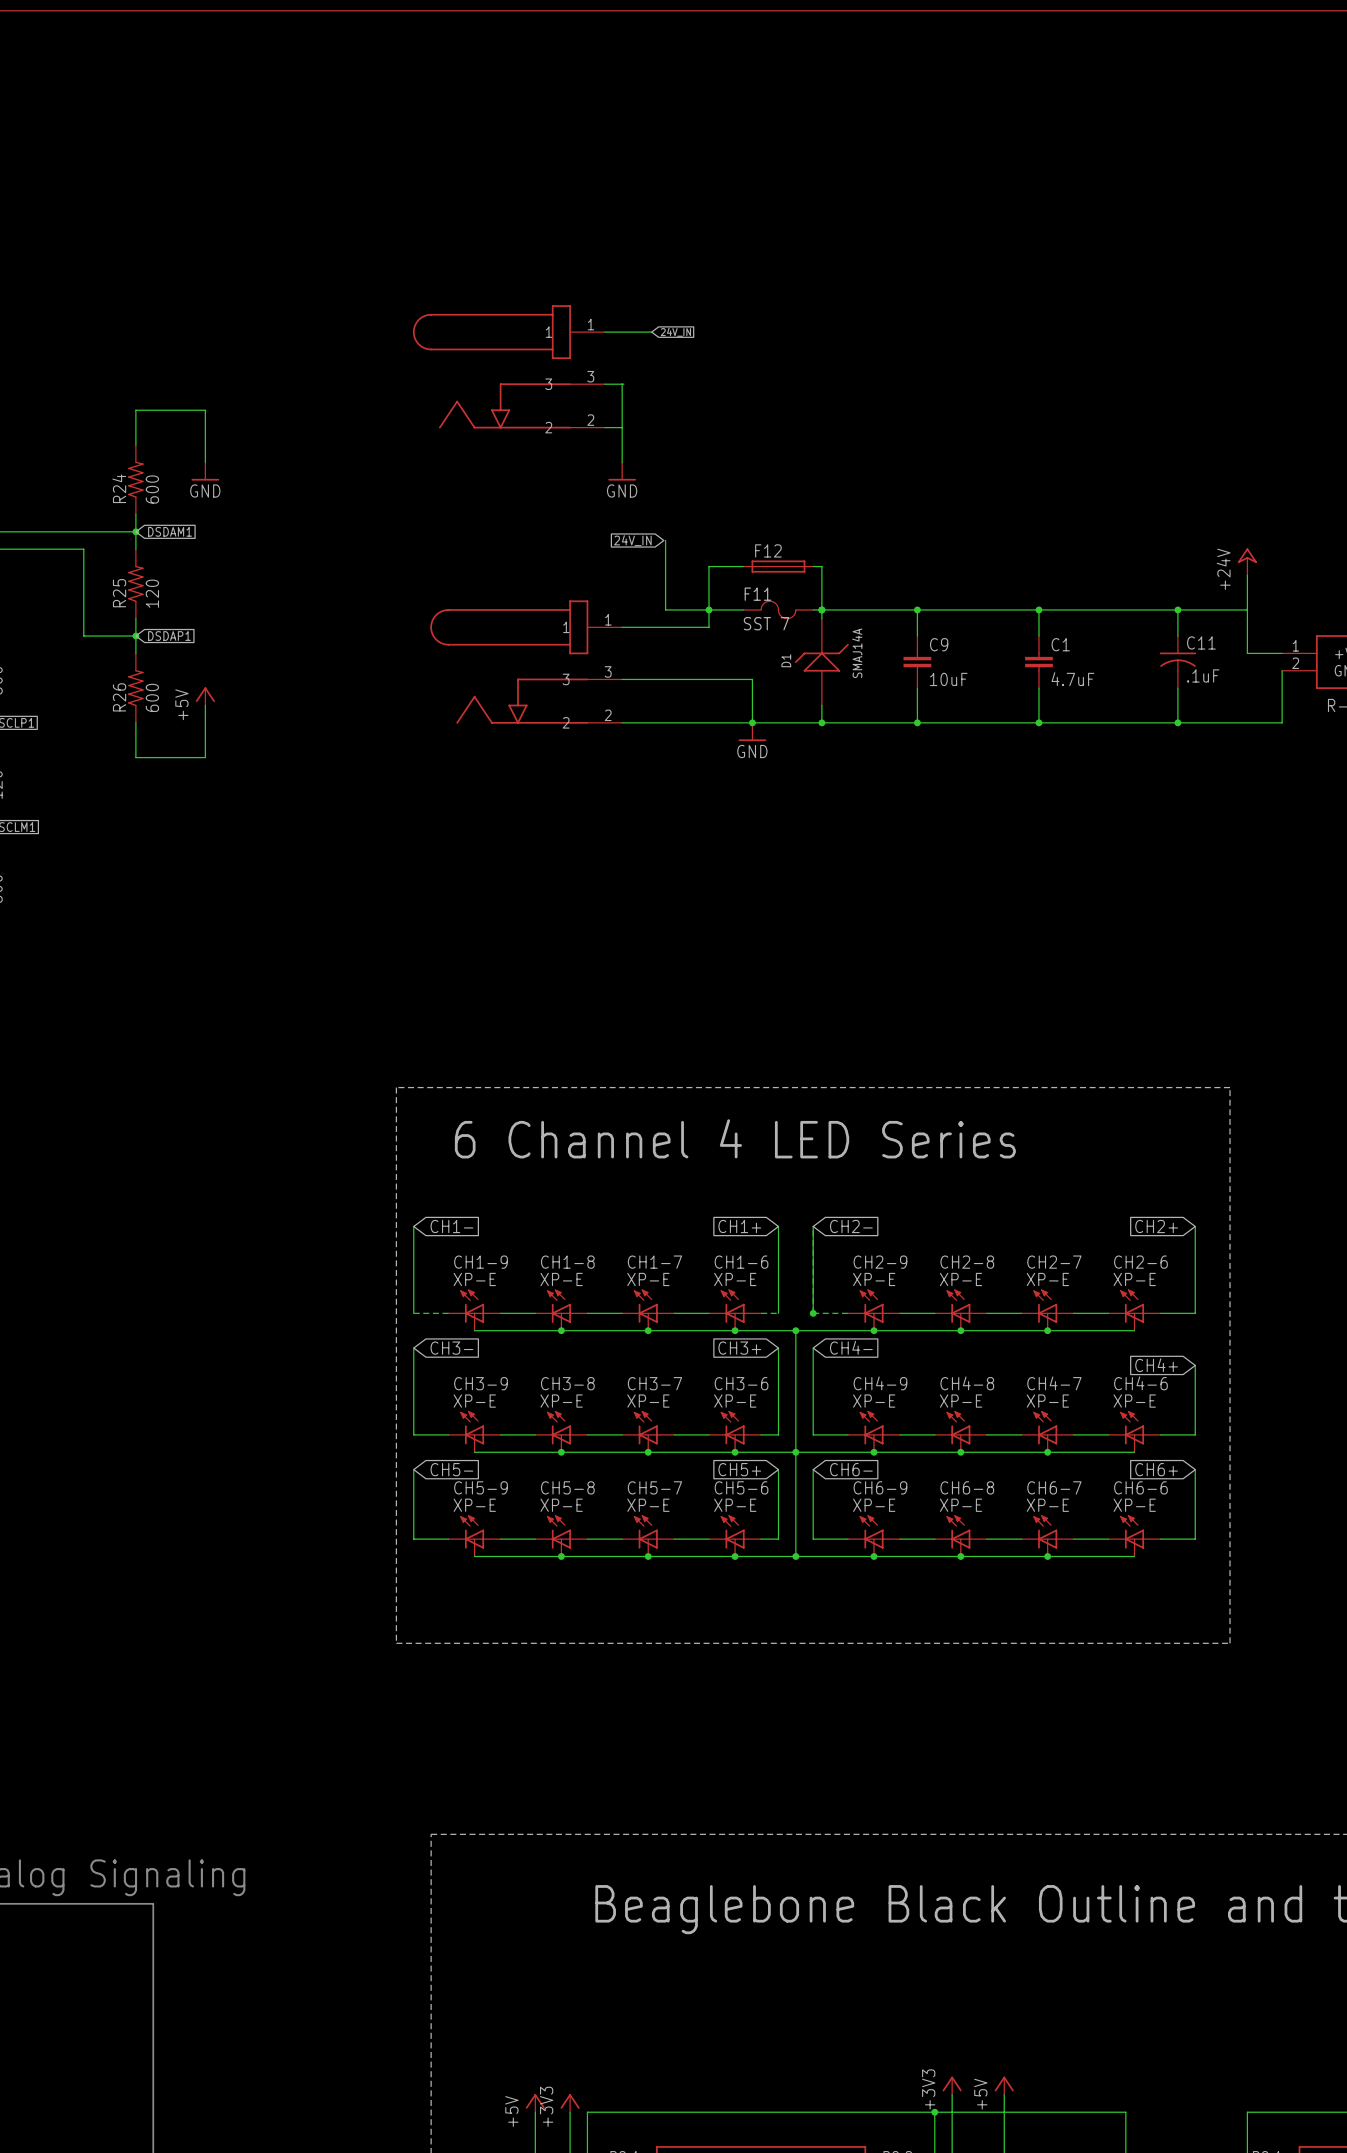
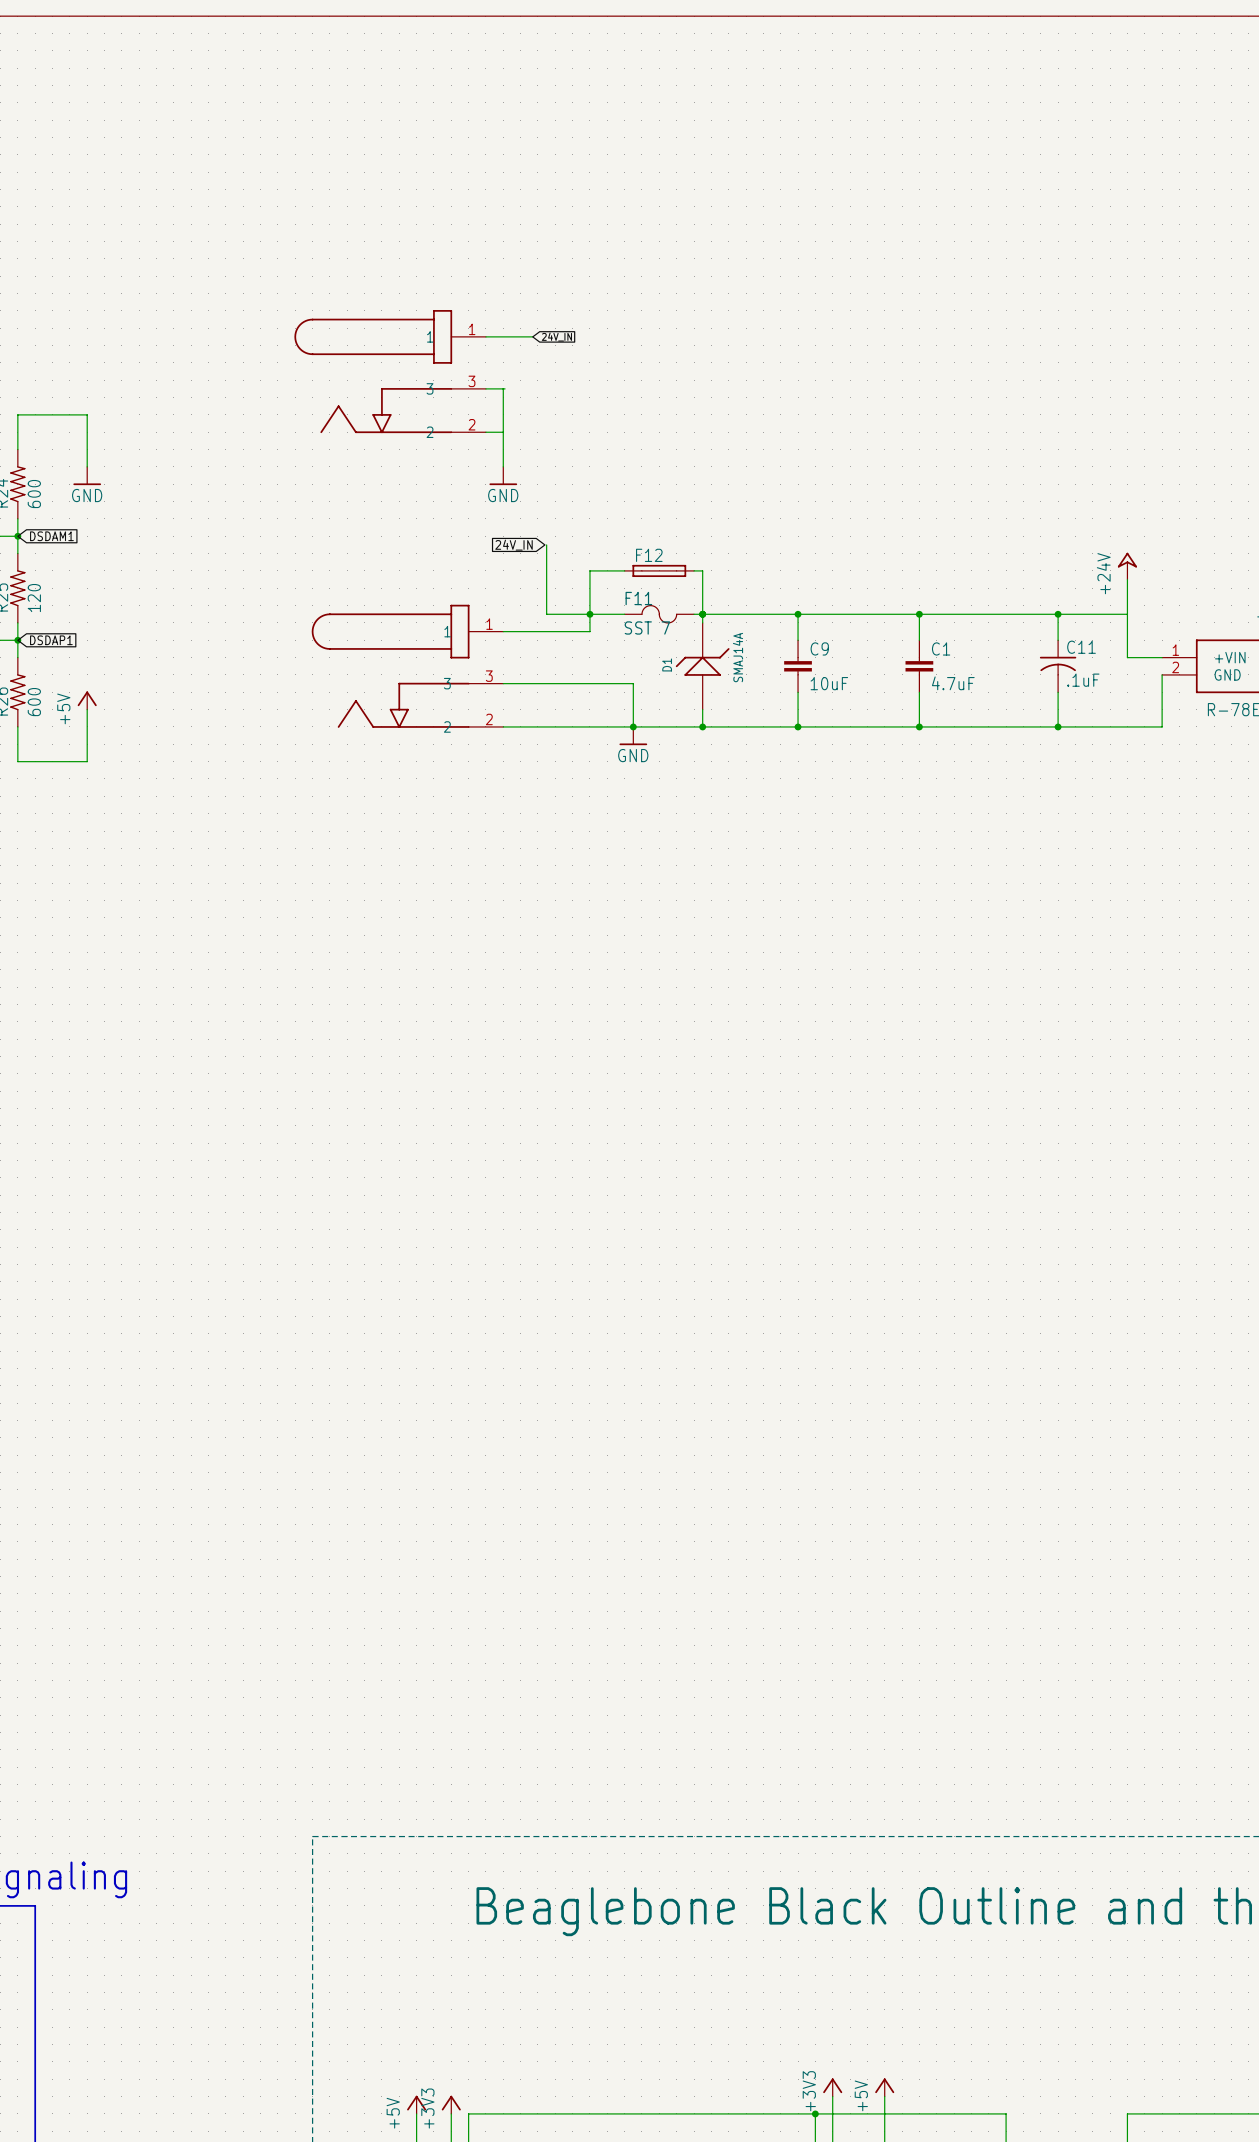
line: (396, 1087) (1230, 1087) (1230, 1643) (396, 1643) (396, 1087) -> none
text: 6 Channel 4 LED Series (735, 1138) -> none
wire: (413, 1226) (413, 1313) (448, 1313) -> none
global label: CH1- (451, 1226) -> none
global label: CH1+ (739, 1226) -> none
wire: (778, 1226) (778, 1313) (761, 1313) -> none
global label: CH2- (851, 1226) -> none
global label: CH2+ (1156, 1226) -> none
wire: (1195, 1226) (1195, 1313) (1160, 1313) -> none
CH1-9: XP-E (474, 1310) -> none
CH1-8: XP-E (561, 1310) -> none
CH1-7: XP-E (648, 1310) -> none
CH1-6: XP-E (735, 1310) -> none
CH2-9: XP-E (873, 1310) -> none
CH2-8: XP-E (960, 1310) -> none
CH2-7: XP-E (1047, 1310) -> none
CH2-6: XP-E (1134, 1310) -> none
wire: (500, 1313) (535, 1313) -> none
wire: (587, 1313) (622, 1313) -> none
wire: (674, 1313) (709, 1313) -> none
wire: (813, 1313) (847, 1313) -> none
wire: (813, 1313) (813, 1226) (813, 1313) -> none
junction: (813, 1313) -> none
wire: (900, 1313) (934, 1313) -> none
wire: (986, 1313) (1021, 1313) -> none
wire: (1073, 1313) (1108, 1313) -> none
wire: (474, 1330) (1134, 1330) -> none
junction: (561, 1330) -> none
junction: (648, 1330) -> none
junction: (735, 1330) -> none
wire: (795, 1330) (795, 1556) -> none
junction: (795, 1330) -> none
junction: (873, 1330) -> none
junction: (960, 1330) -> none
junction: (1047, 1330) -> none
global label: CH4- (851, 1347) -> none
wire: (413, 1348) (413, 1434) (448, 1434) -> none
global label: CH3- (451, 1348) -> none
global label: CH3+ (739, 1348) -> none
wire: (778, 1348) (778, 1434) (761, 1434) -> none
wire: (813, 1348) (813, 1434) (847, 1434) -> none
global label: CH4+ (1156, 1365) -> none
wire: (1195, 1365) (1195, 1434) (1160, 1434) -> none
CH3-9: XP-E (474, 1431) -> none
CH3-8: XP-E (561, 1431) -> none
CH3-7: XP-E (648, 1431) -> none
CH3-6: XP-E (735, 1431) -> none
CH4-9: XP-E (873, 1431) -> none
CH4-8: XP-E (960, 1431) -> none
CH4-7: XP-E (1047, 1431) -> none
CH4-6: XP-E (1134, 1431) -> none
wire: (500, 1434) (535, 1434) -> none
wire: (587, 1434) (622, 1434) -> none
wire: (674, 1434) (709, 1434) -> none
wire: (900, 1434) (934, 1434) -> none
wire: (986, 1434) (1021, 1434) -> none
wire: (1073, 1434) (1108, 1434) -> none
wire: (474, 1452) (1134, 1452) -> none
junction: (561, 1452) -> none
junction: (648, 1452) -> none
junction: (735, 1452) -> none
junction: (795, 1452) -> none
junction: (873, 1452) -> none
junction: (960, 1452) -> none
junction: (1047, 1452) -> none
wire: (413, 1469) (413, 1539) (448, 1539) -> none
global label: CH5- (451, 1469) -> none
global label: CH5+ (739, 1469) -> none
wire: (778, 1469) (778, 1539) (761, 1539) -> none
wire: (813, 1469) (813, 1539) (847, 1539) -> none
global label: CH6- (851, 1469) -> none
global label: CH6+ (1156, 1469) -> none
wire: (1195, 1469) (1195, 1539) (1160, 1539) -> none
CH5-9: XP-E (474, 1535) -> none
CH5-8: XP-E (561, 1535) -> none
CH5-7: XP-E (648, 1535) -> none
CH5-6: XP-E (735, 1535) -> none
CH6-9: XP-E (873, 1535) -> none
CH6-8: XP-E (960, 1535) -> none
CH6-7: XP-E (1047, 1535) -> none
CH6-6: XP-E (1134, 1535) -> none
wire: (500, 1539) (535, 1539) -> none
wire: (587, 1539) (622, 1539) -> none
wire: (674, 1539) (709, 1539) -> none
wire: (900, 1539) (934, 1539) -> none
wire: (986, 1539) (1021, 1539) -> none
wire: (1073, 1539) (1108, 1539) -> none
wire: (474, 1556) (1134, 1556) -> none
junction: (561, 1556) -> none
junction: (648, 1556) -> none
junction: (735, 1556) -> none
junction: (795, 1556) -> none
junction: (873, 1556) -> none
junction: (960, 1556) -> none
junction: (1047, 1556) -> none

